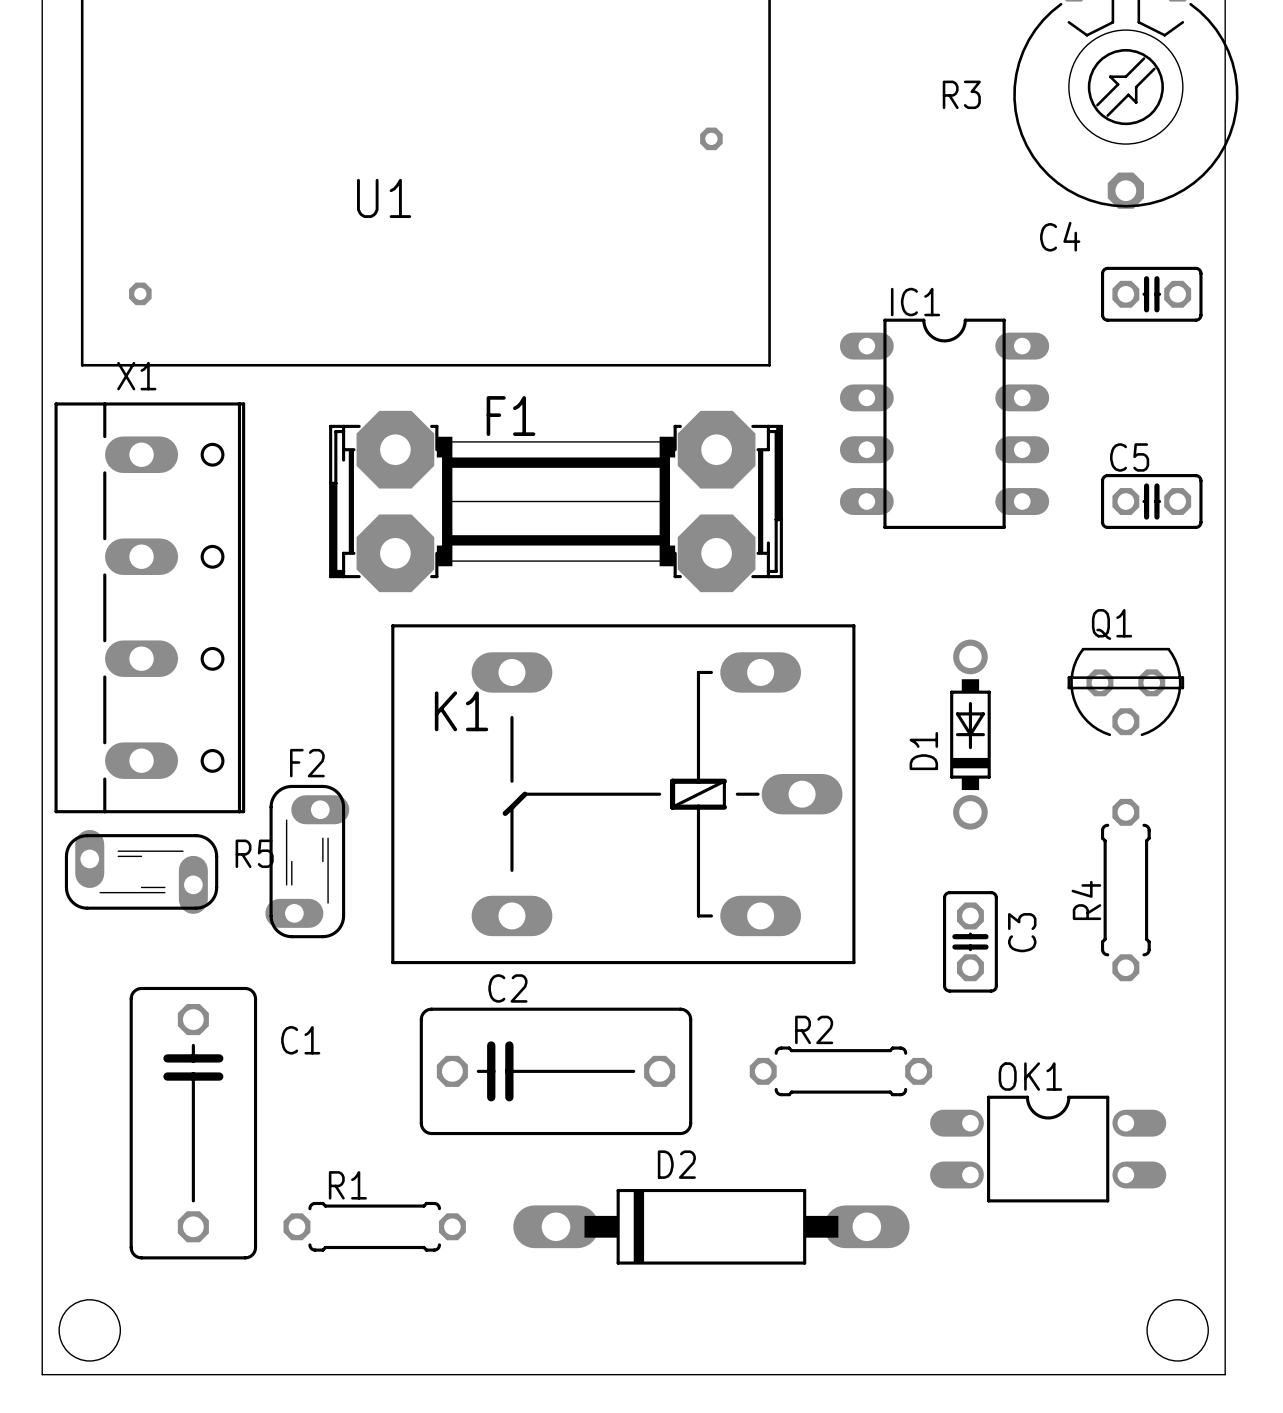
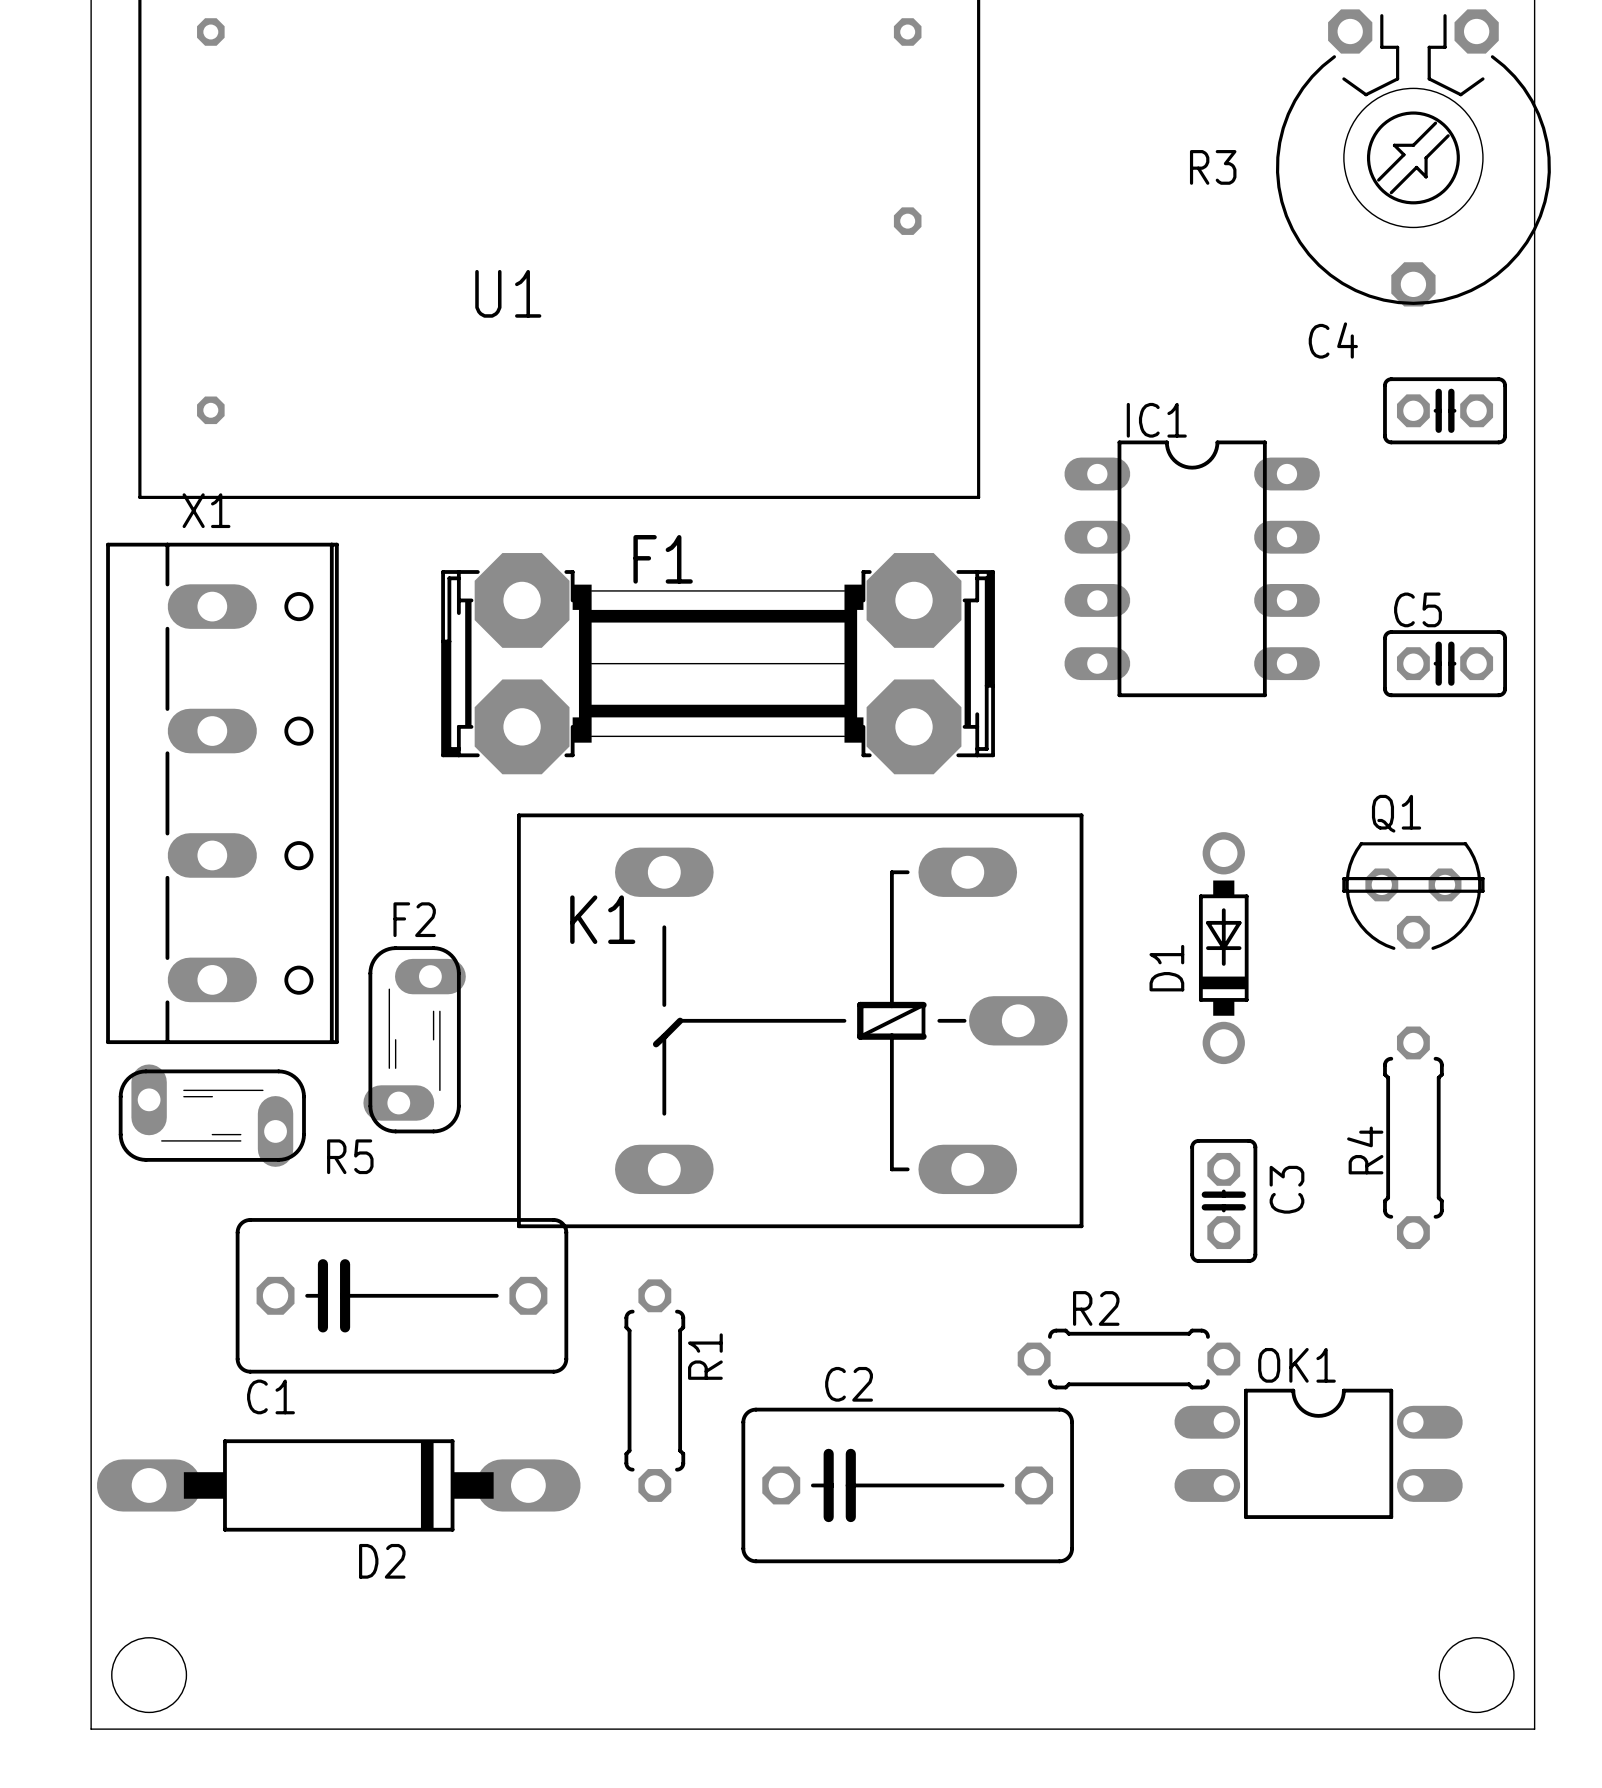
R5 name position: R5 (254, 853) -> R5 (350, 1156)
F2 position: (307, 861) -> (414, 1039)
C1 name position: C1 (300, 1040) -> C1 (270, 1396)
C2 position: (556, 1071) -> (907, 1485)
R2 position: (840, 1071) -> (1128, 1359)
C1 rotation: 0° (193, 1123) -> 90° counterclockwise (401, 1295)
R1 rotation: 0° (374, 1226) -> 90° clockwise (654, 1390)
R1 position: (374, 1226) -> (654, 1390)
D2 rotation: 0° (711, 1226) -> 180° (338, 1485)
D2 position: (711, 1226) -> (338, 1485)

